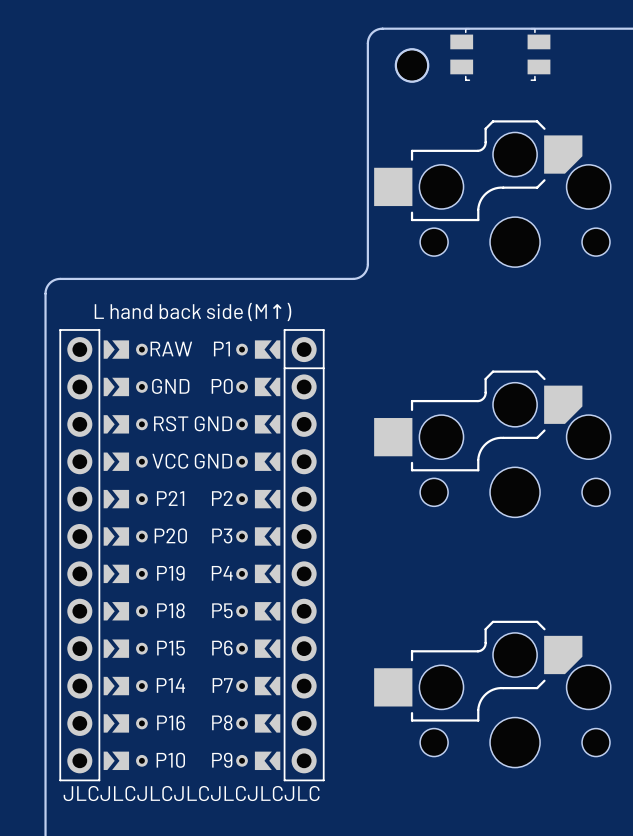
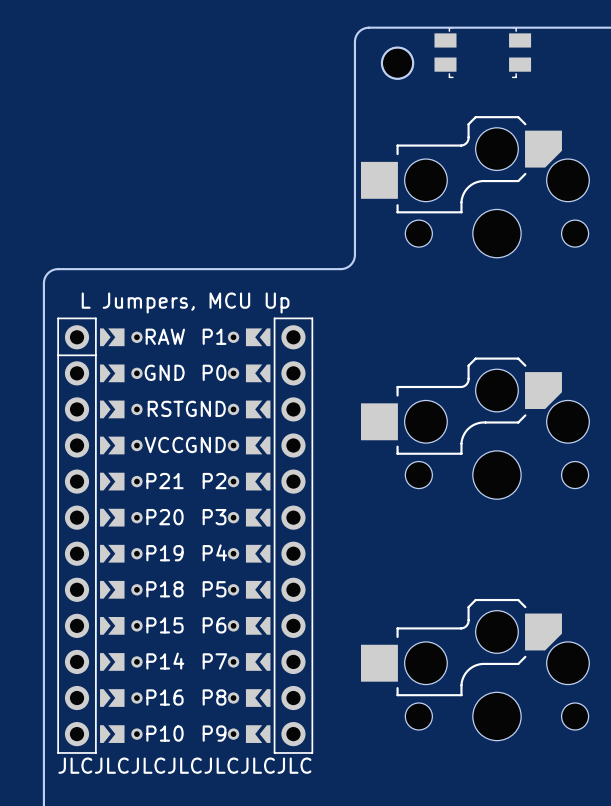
part footprint: [59, 329, 325, 782] -> [57, 317, 314, 754]

